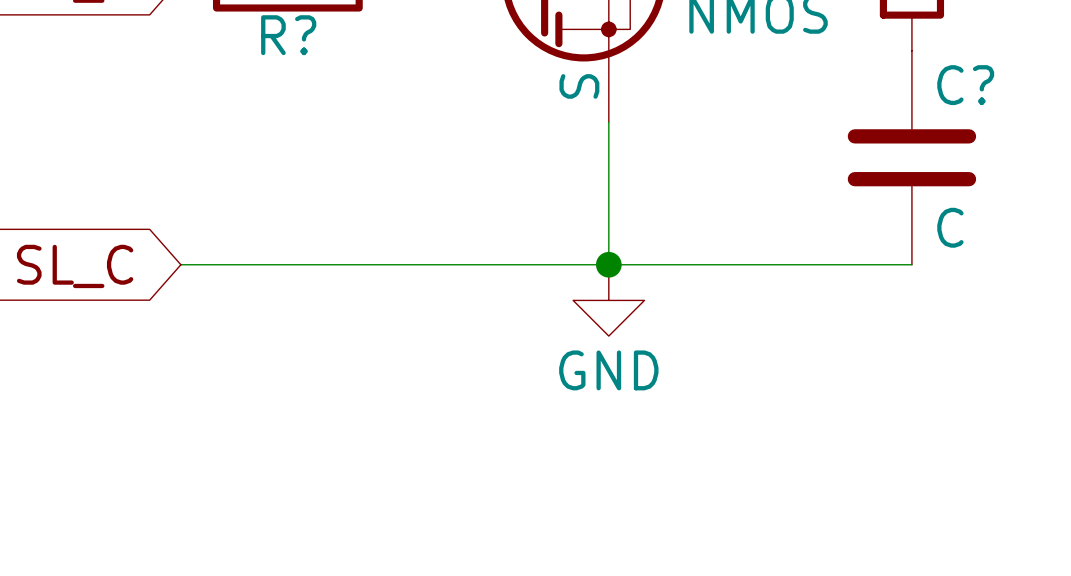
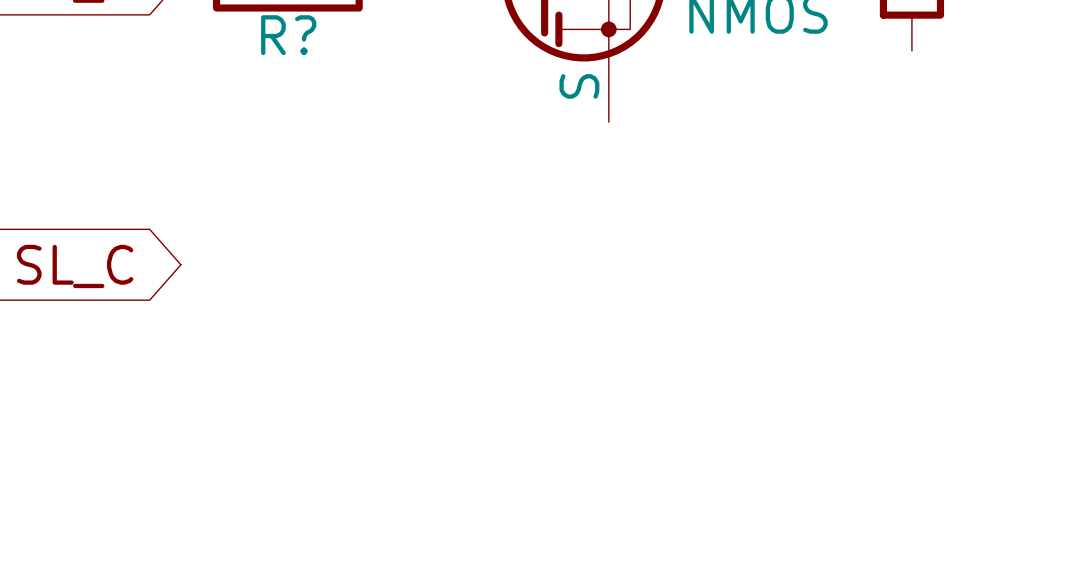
wire: (608, 122) (608, 264) -> none
C?: C (911, 157) -> none
wire: (180, 264) (911, 264) -> none
junction: (608, 264) -> none
power symbol: GND (608, 300) -> none

